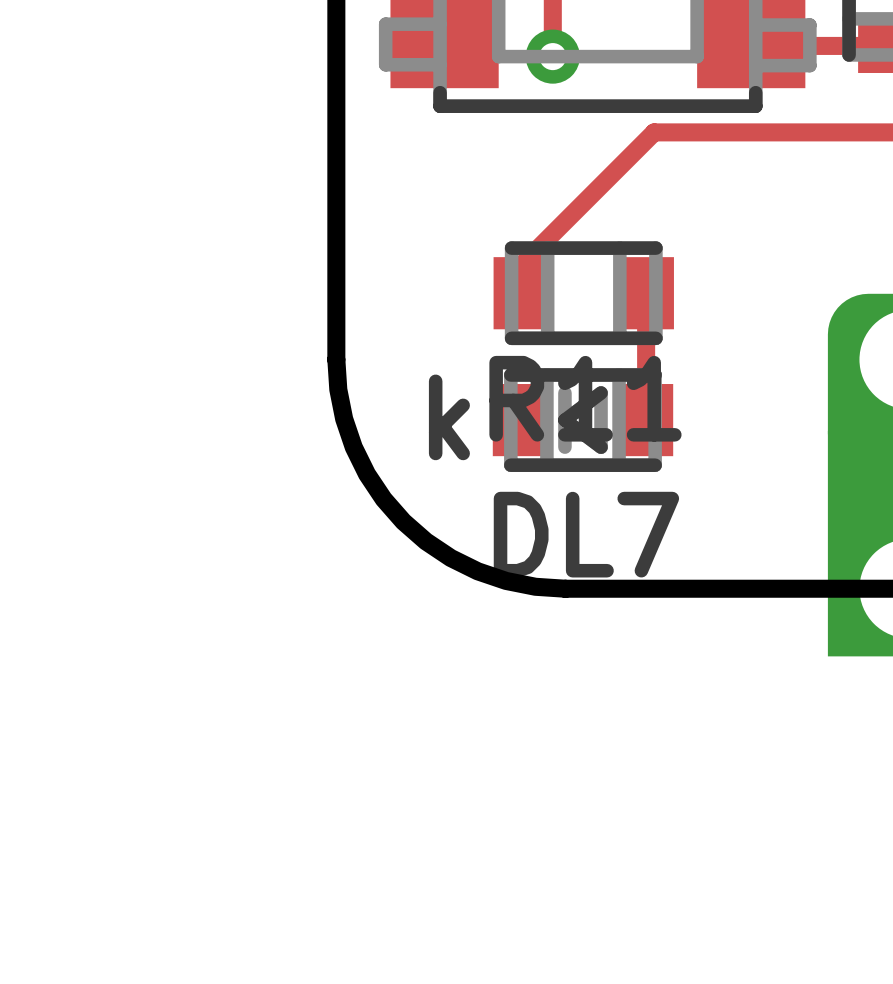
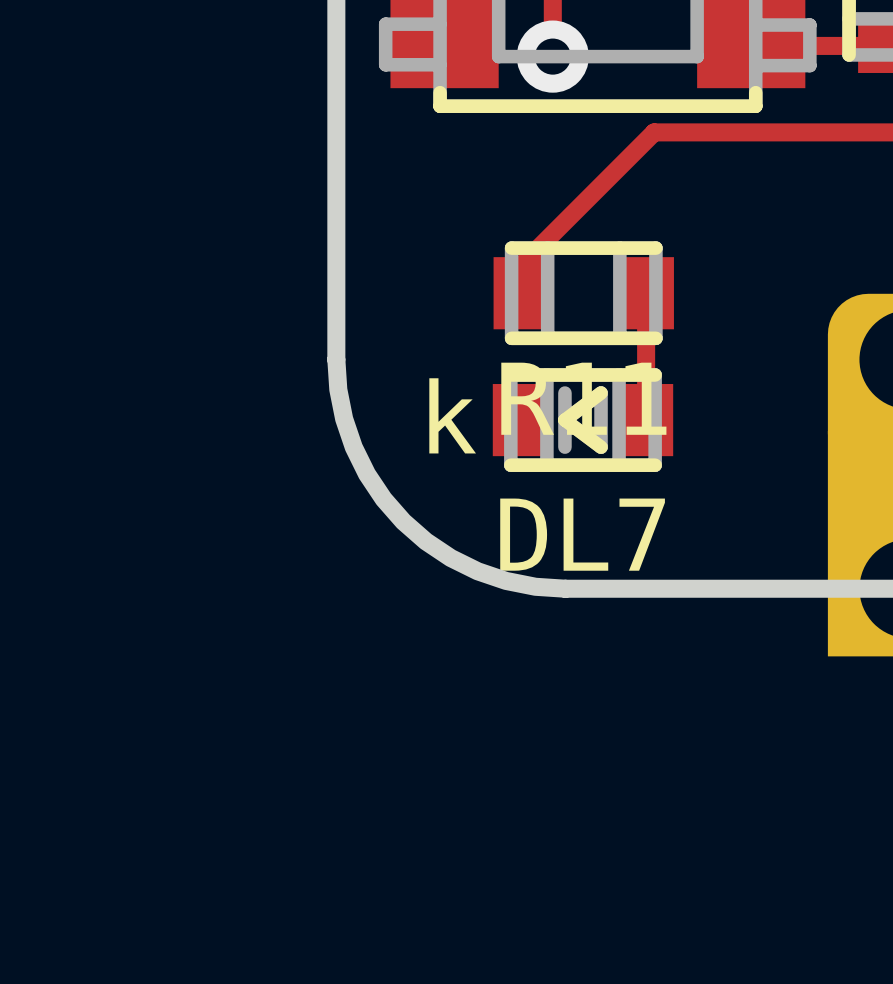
via size: [525, 29, 580, 84] -> [516, 20, 589, 93]

